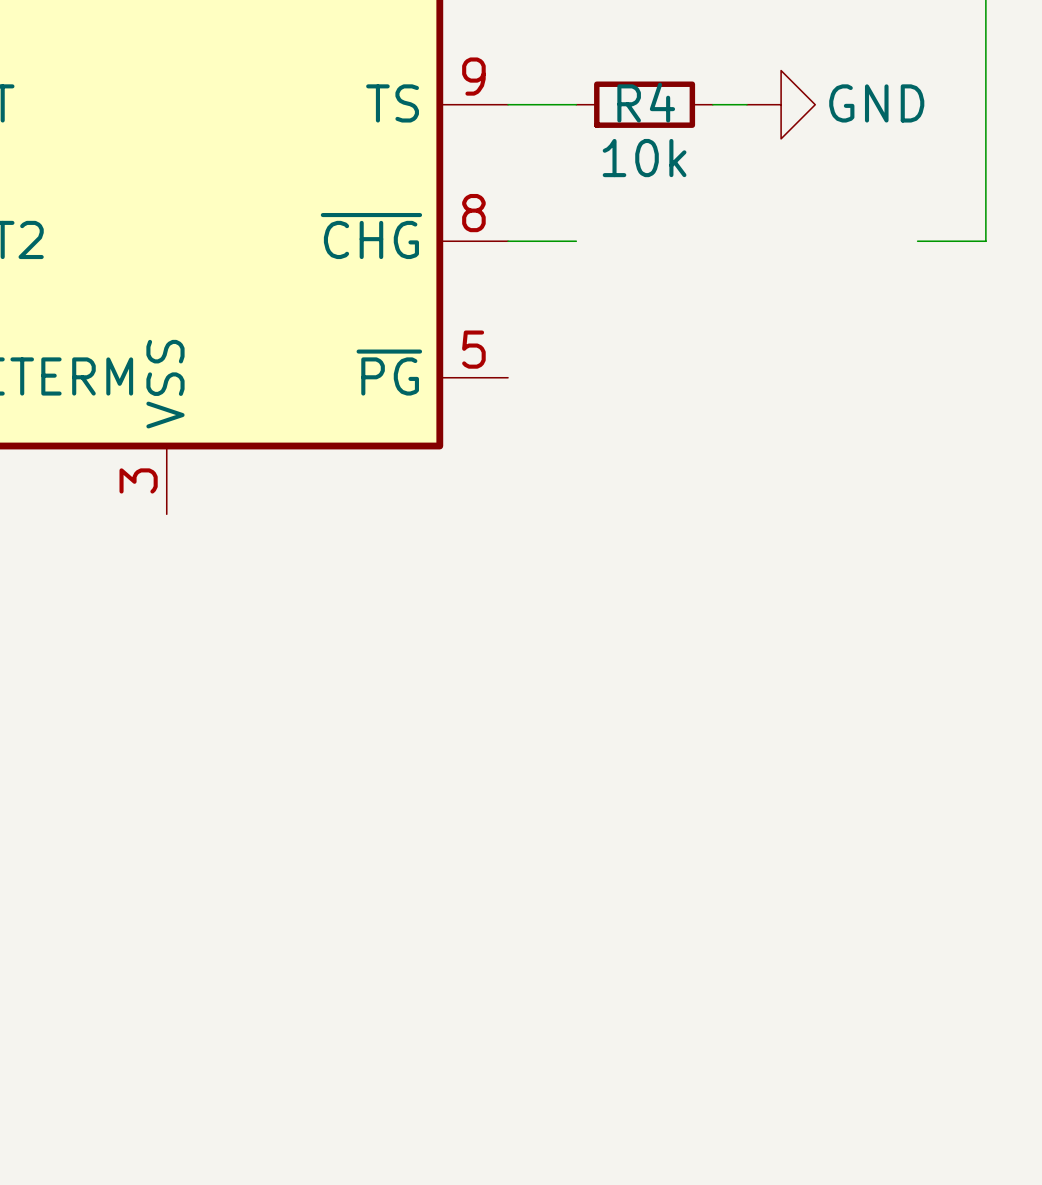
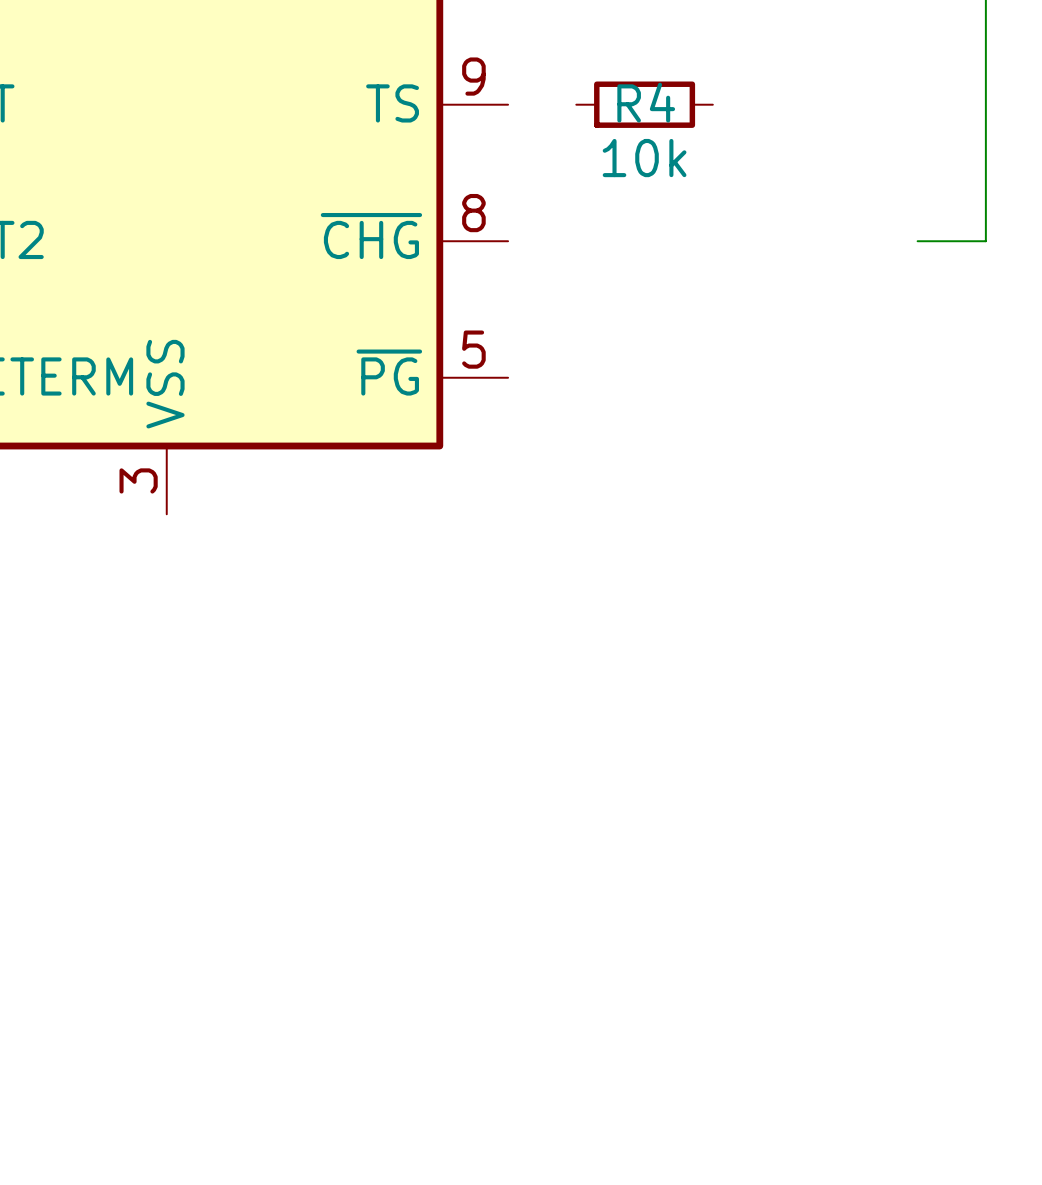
wire: (508, 104) (576, 104) -> none
wire: (712, 104) (746, 104) -> none
power symbol: GND (781, 104) -> none
wire: (508, 241) (576, 241) -> none

